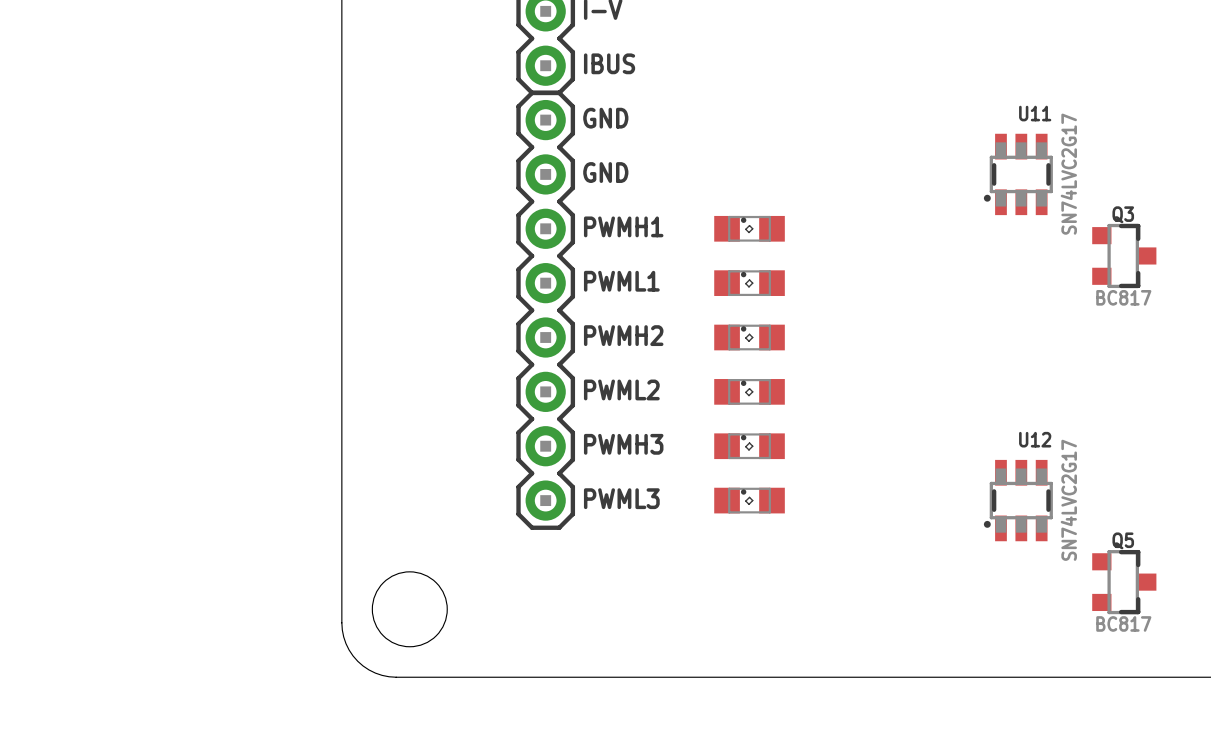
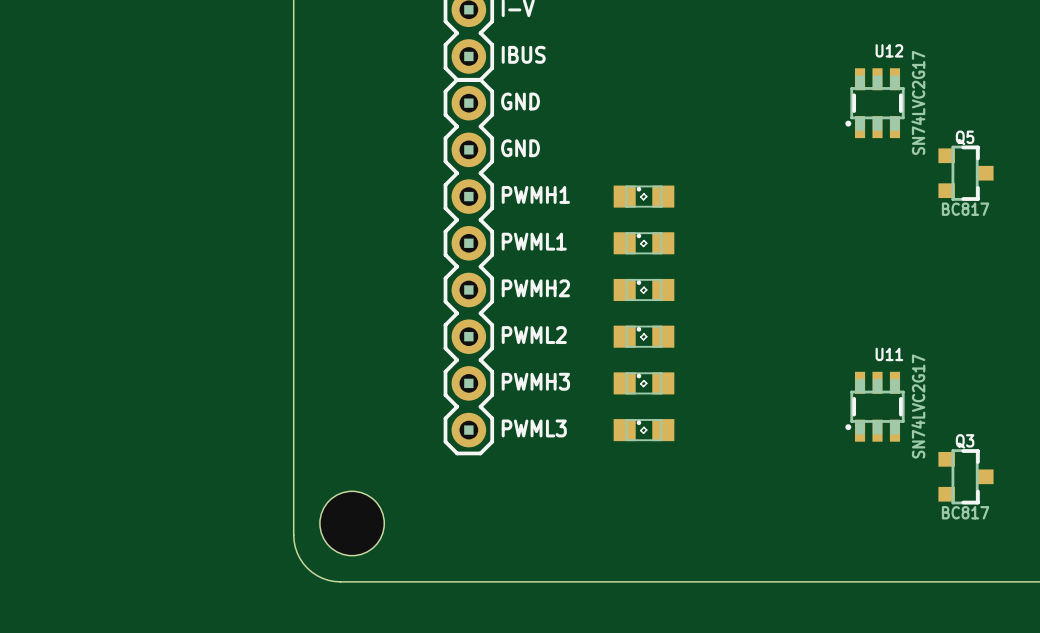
U11 position: (1018, 174) -> (875, 406)
Q3 position: (1124, 255) -> (965, 476)
U12 position: (1018, 500) -> (875, 103)
Q5 position: (1124, 582) -> (965, 173)

